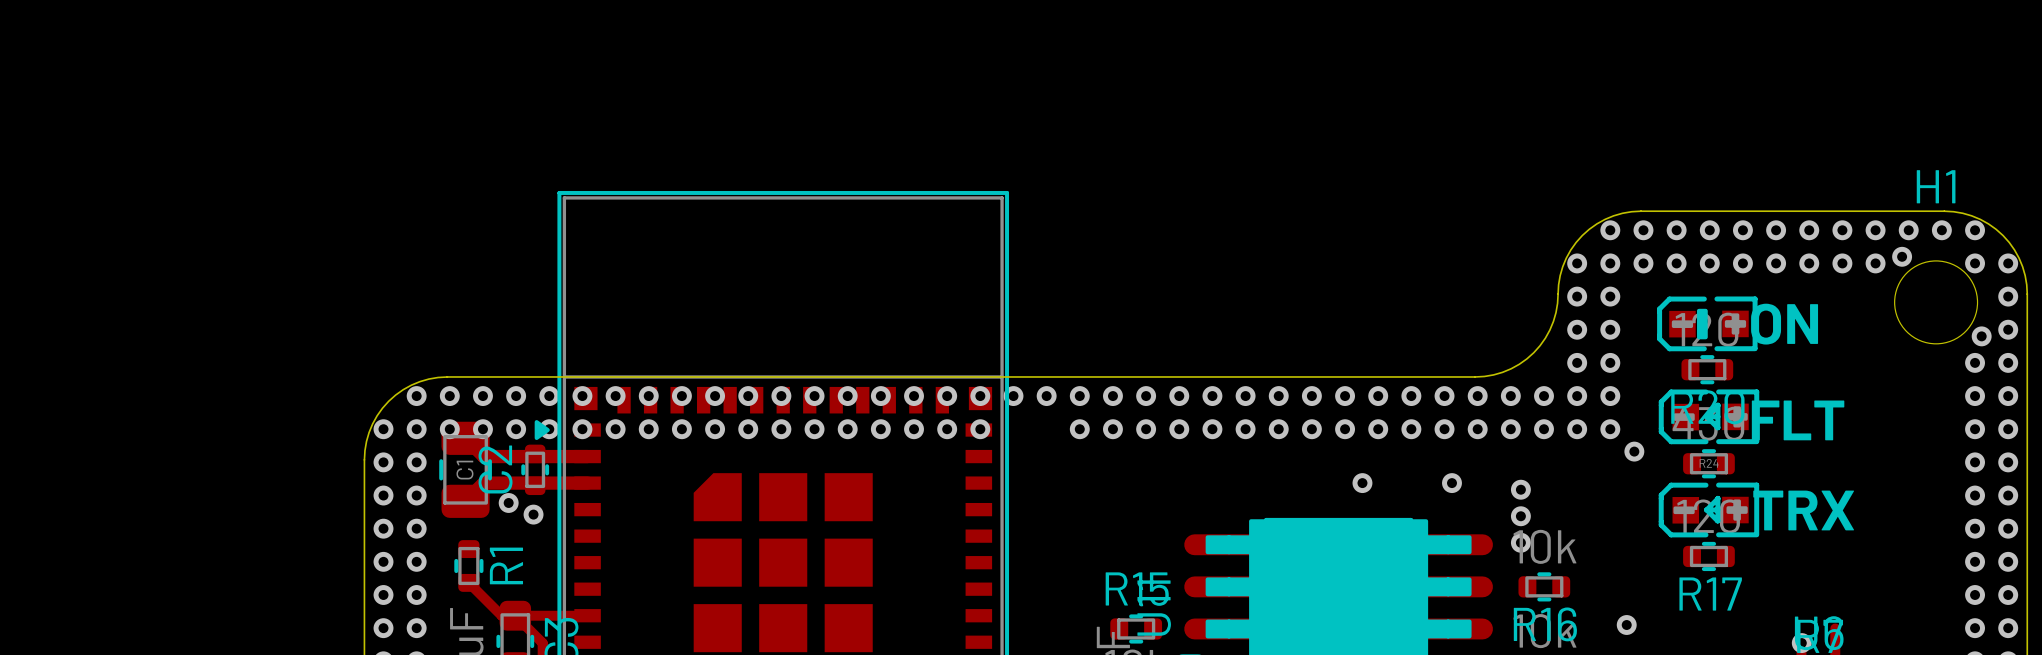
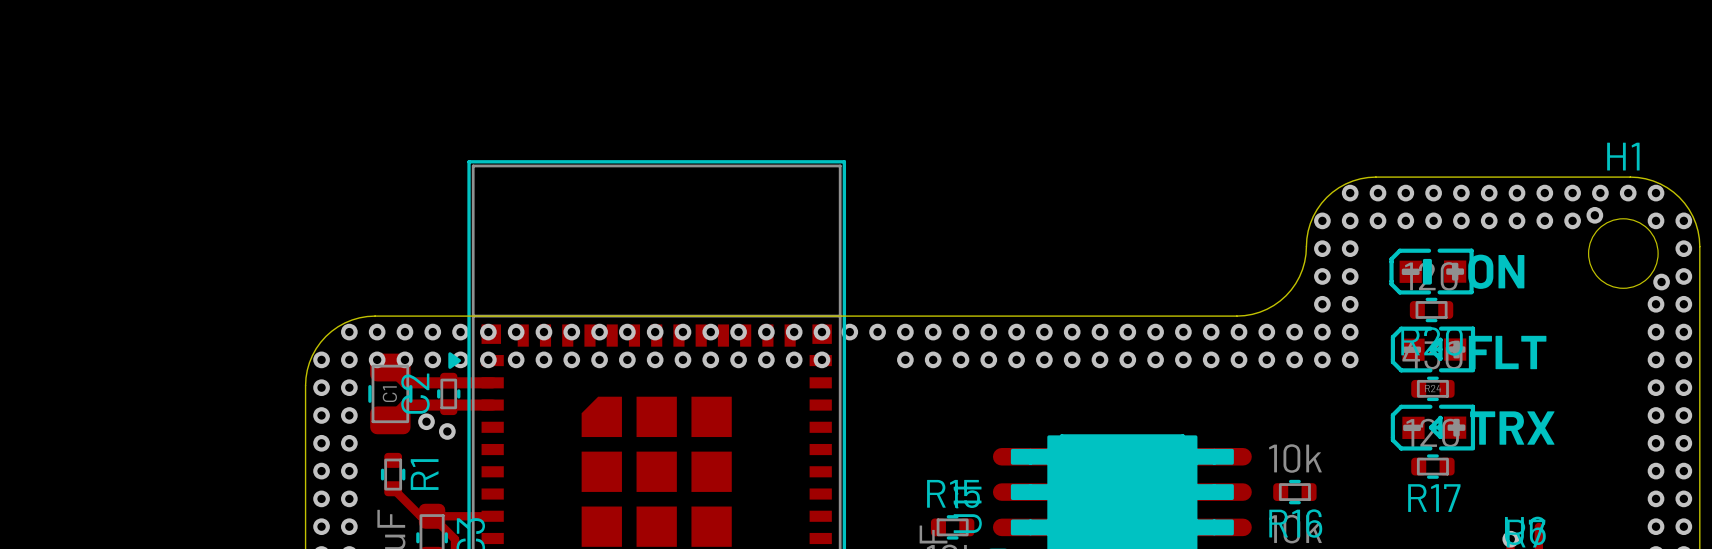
via: (1634, 451) -> none
via: (1362, 483) -> none
via: (1451, 483) -> none
via: (1520, 489) -> none
via: (1520, 516) -> none
via: (1520, 542) -> none
via: (1626, 625) -> none

